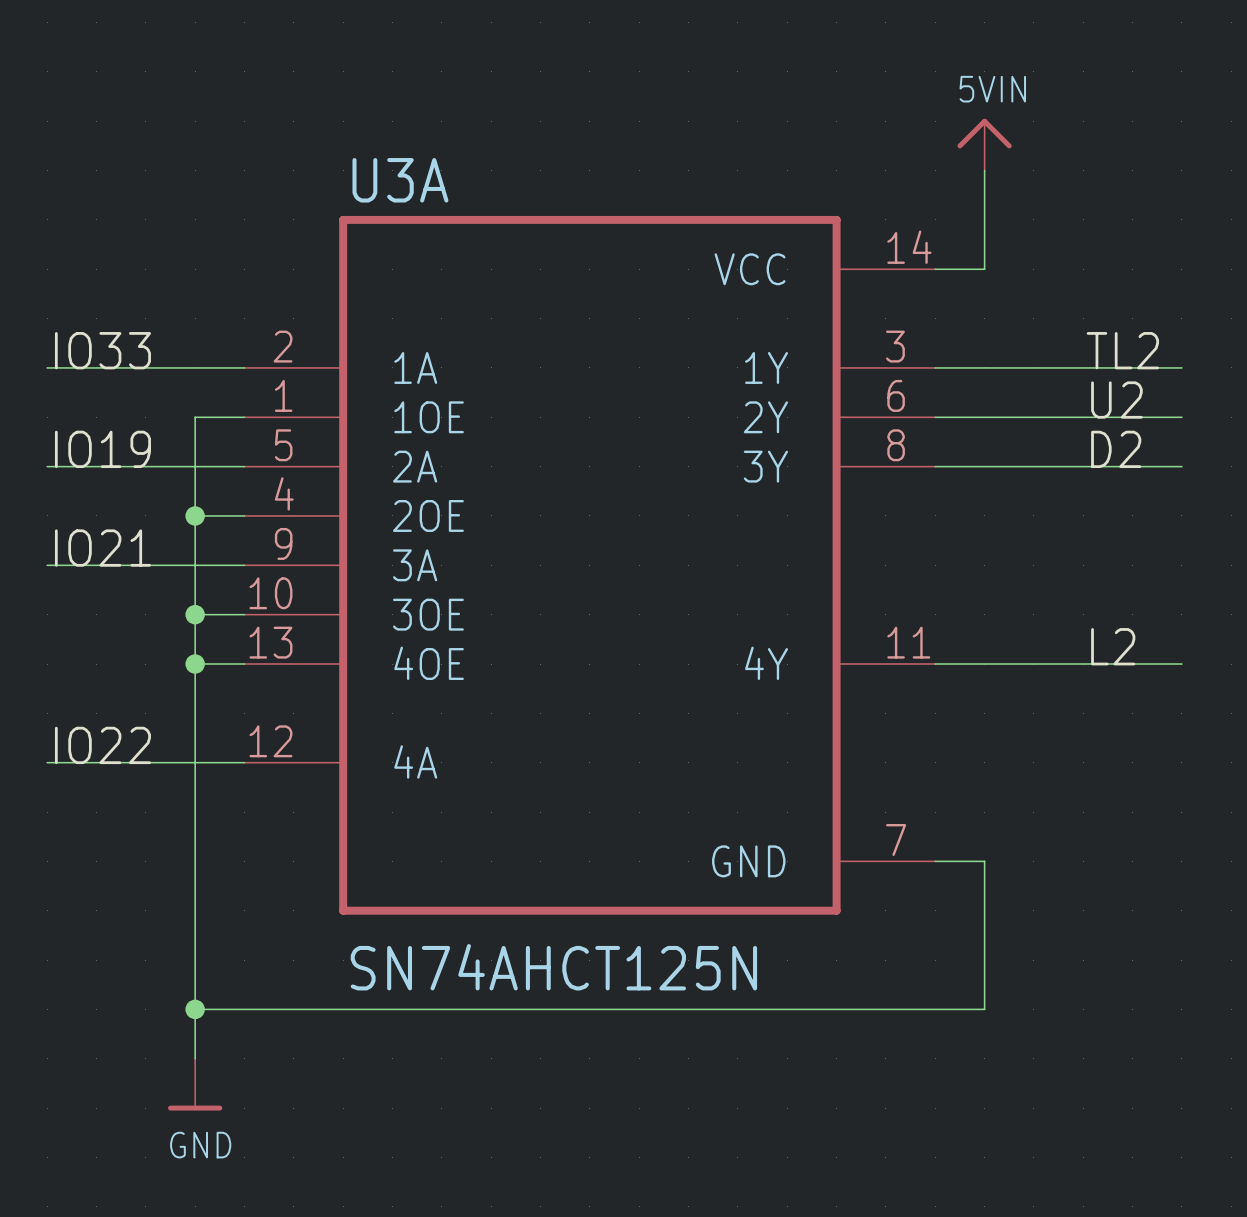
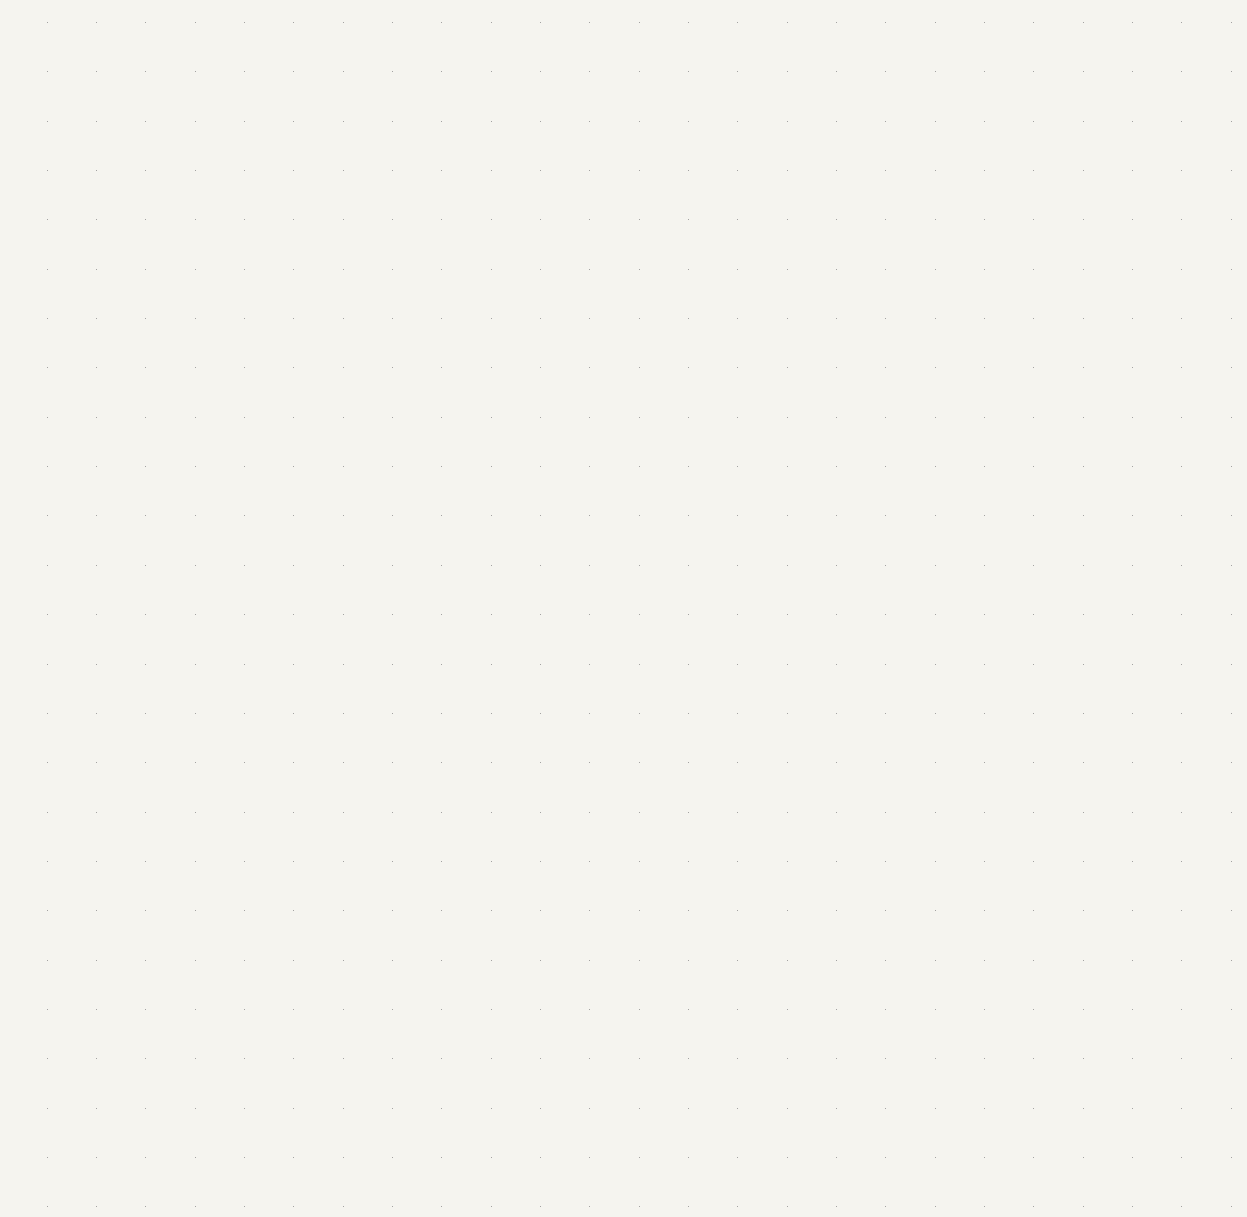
power symbol: 5VIN (984, 144) -> none
wire: (984, 170) (984, 269) (935, 269) -> none
label: IO33 (102, 350) -> none
label: TL2 (1122, 350) -> none
wire: (47, 367) (244, 367) -> none
wire: (935, 367) (1181, 367) -> none
label: U2 (1116, 400) -> none
wire: (244, 417) (195, 417) (195, 1058) -> none
wire: (935, 417) (1181, 417) -> none
label: IO19 (102, 449) -> none
label: D2 (1116, 449) -> none
wire: (47, 466) (244, 466) -> none
wire: (935, 466) (1181, 466) -> none
wire: (195, 515) (244, 515) -> none
junction: (195, 515) -> none
label: IO21 (102, 548) -> none
wire: (47, 565) (244, 565) -> none
U3A: SN74AHCT125N (589, 565) -> none
wire: (195, 614) (244, 614) -> none
junction: (195, 614) -> none
label: L2 (1113, 646) -> none
wire: (195, 664) (244, 664) -> none
junction: (195, 664) -> none
wire: (935, 664) (1181, 664) -> none
label: IO22 (102, 745) -> none
wire: (47, 762) (244, 762) -> none
wire: (935, 861) (984, 861) (984, 1009) (195, 1009) -> none
junction: (195, 1009) -> none
power symbol: GND (195, 1084) -> none

